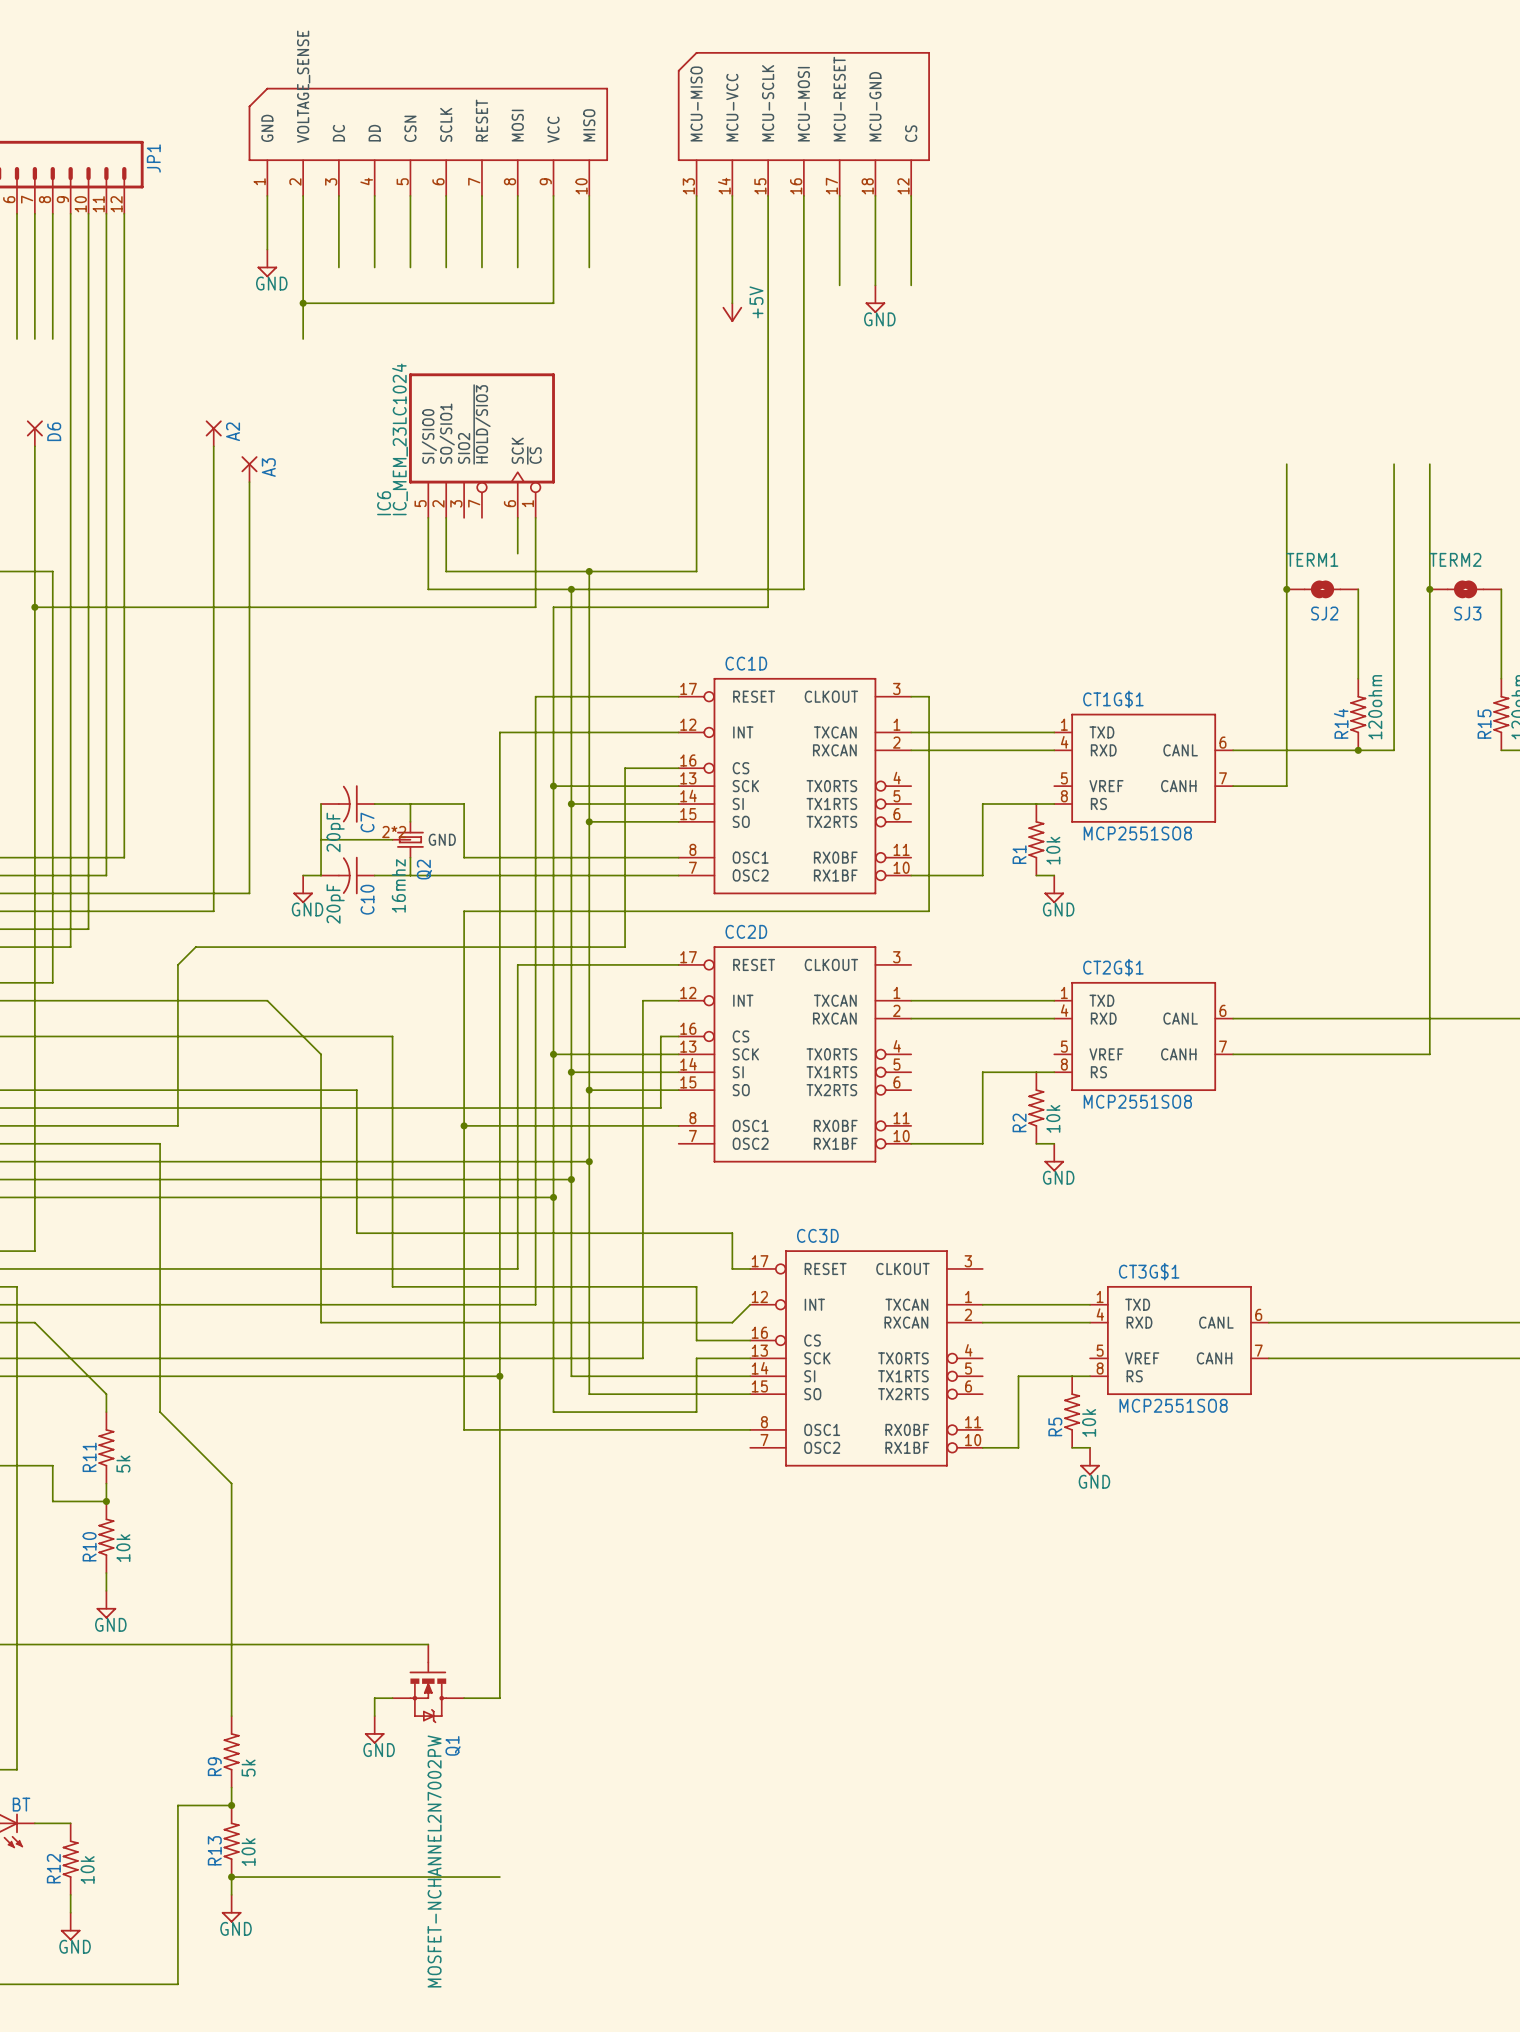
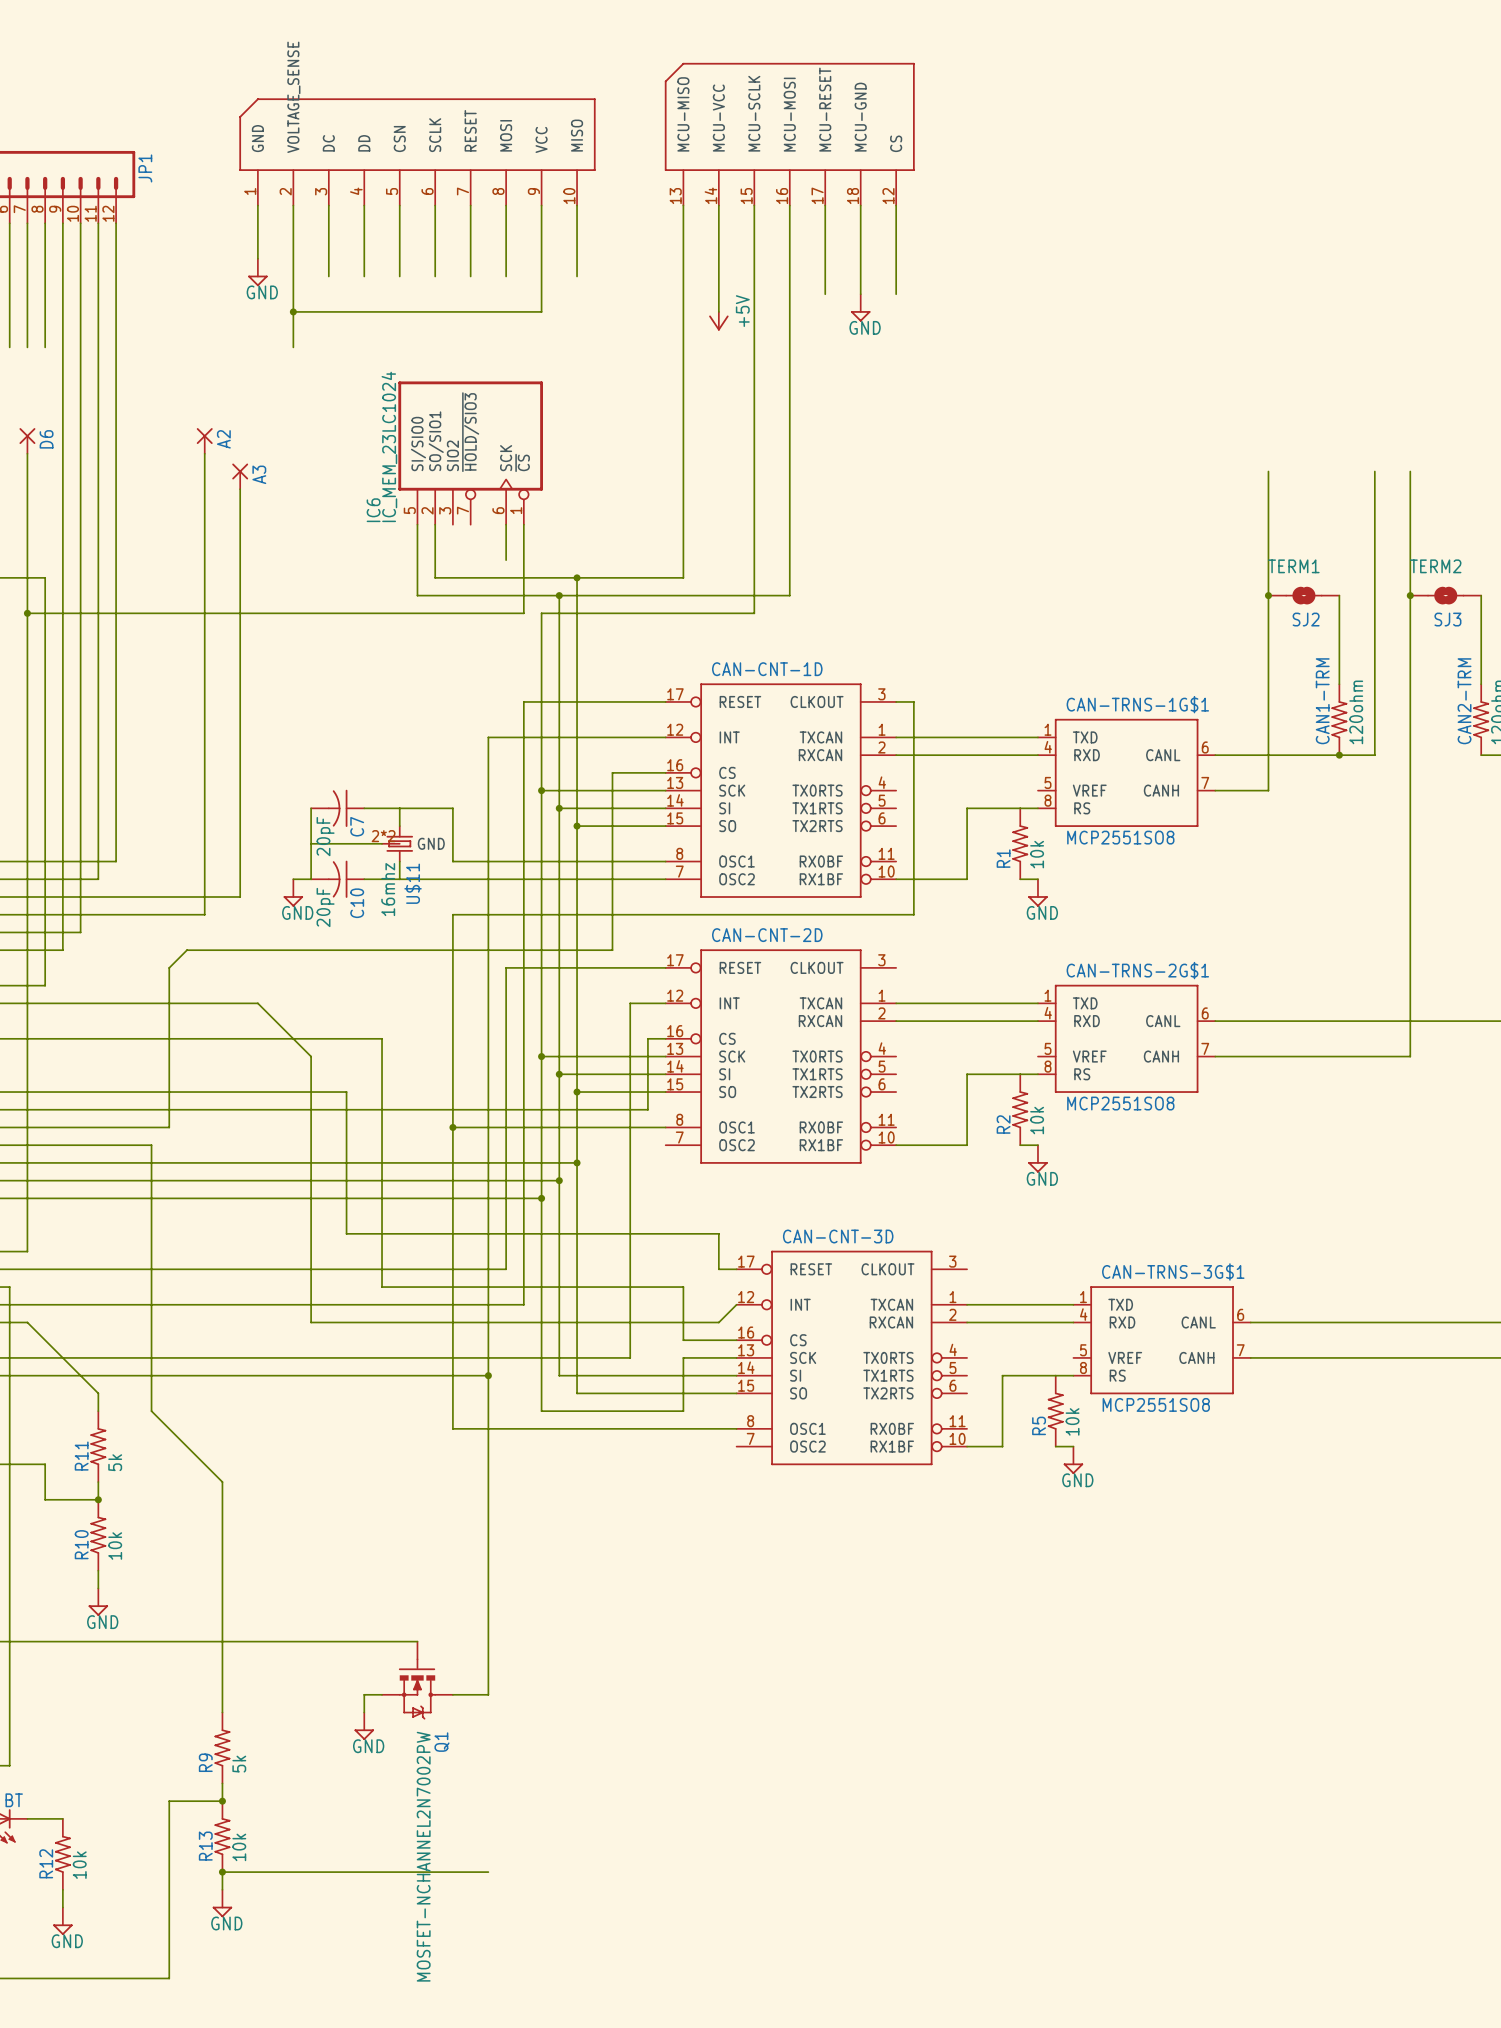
CC1D name: CC1D (746, 663) -> CAN-CNT-1D (767, 669)
CT1G$1 name: CT1G$1 (1113, 699) -> CAN-TRNS-1G$1 (1137, 704)
R14 name: R14 (1341, 723) -> CAN1-TRM (1322, 701)
R15 name: R15 (1484, 724) -> CAN2-TRM (1464, 701)
Q2 name: Q2 (424, 869) -> U$11 (413, 883)
CC2D name: CC2D (746, 931) -> CAN-CNT-2D (767, 935)
CT2G$1 name: CT2G$1 (1113, 967) -> CAN-TRNS-2G$1 (1137, 970)
CC3D name: CC3D (817, 1235) -> CAN-CNT-3D (838, 1236)
CT3G$1 name: CT3G$1 (1149, 1271) -> CAN-TRNS-3G$1 (1173, 1271)

